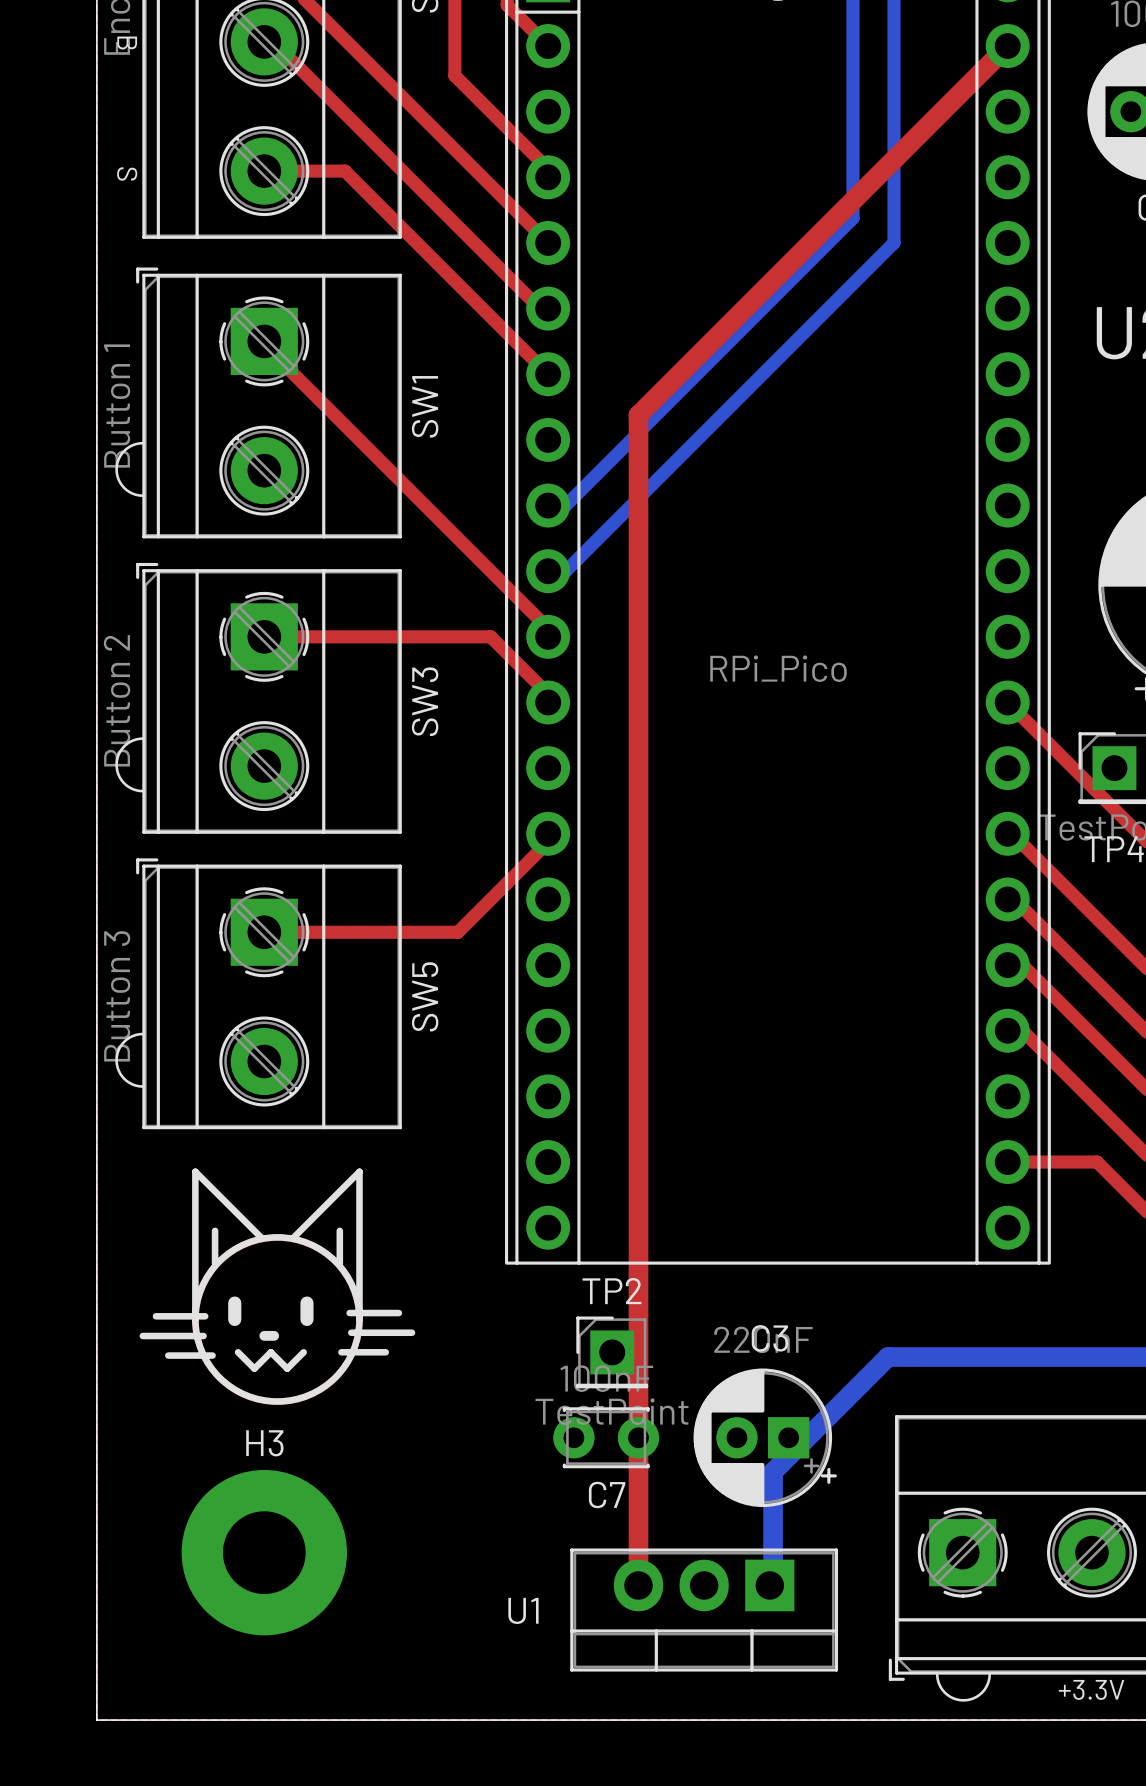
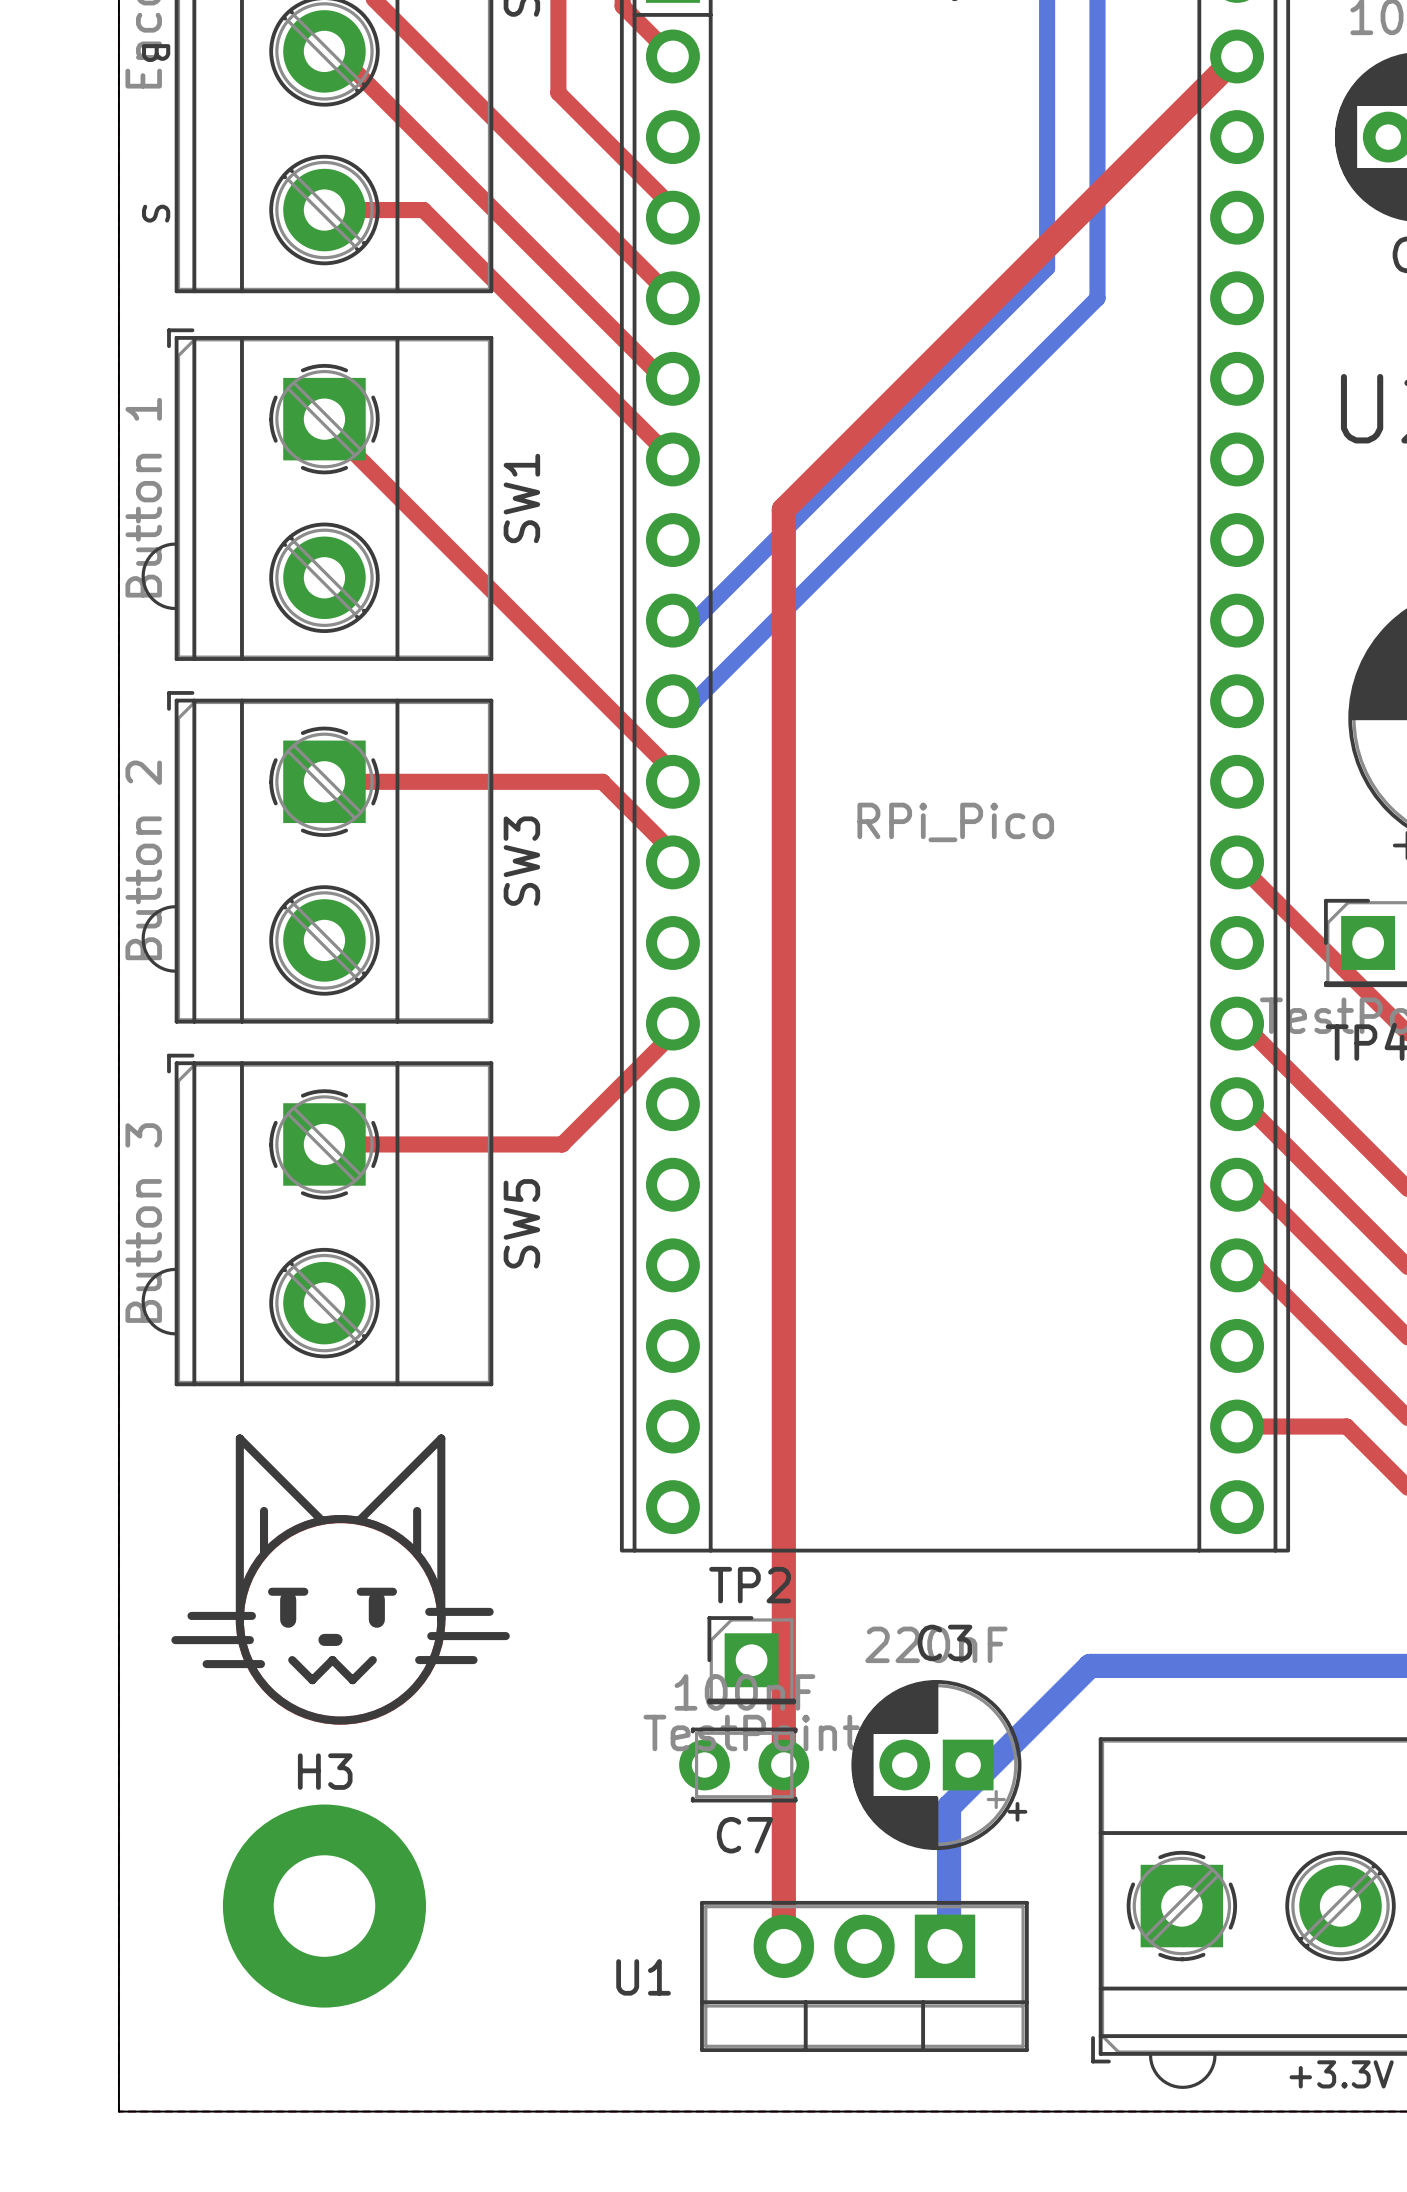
line: none -> (272, 1591) (304, 1591)
line: none -> (360, 1591) (392, 1591)

